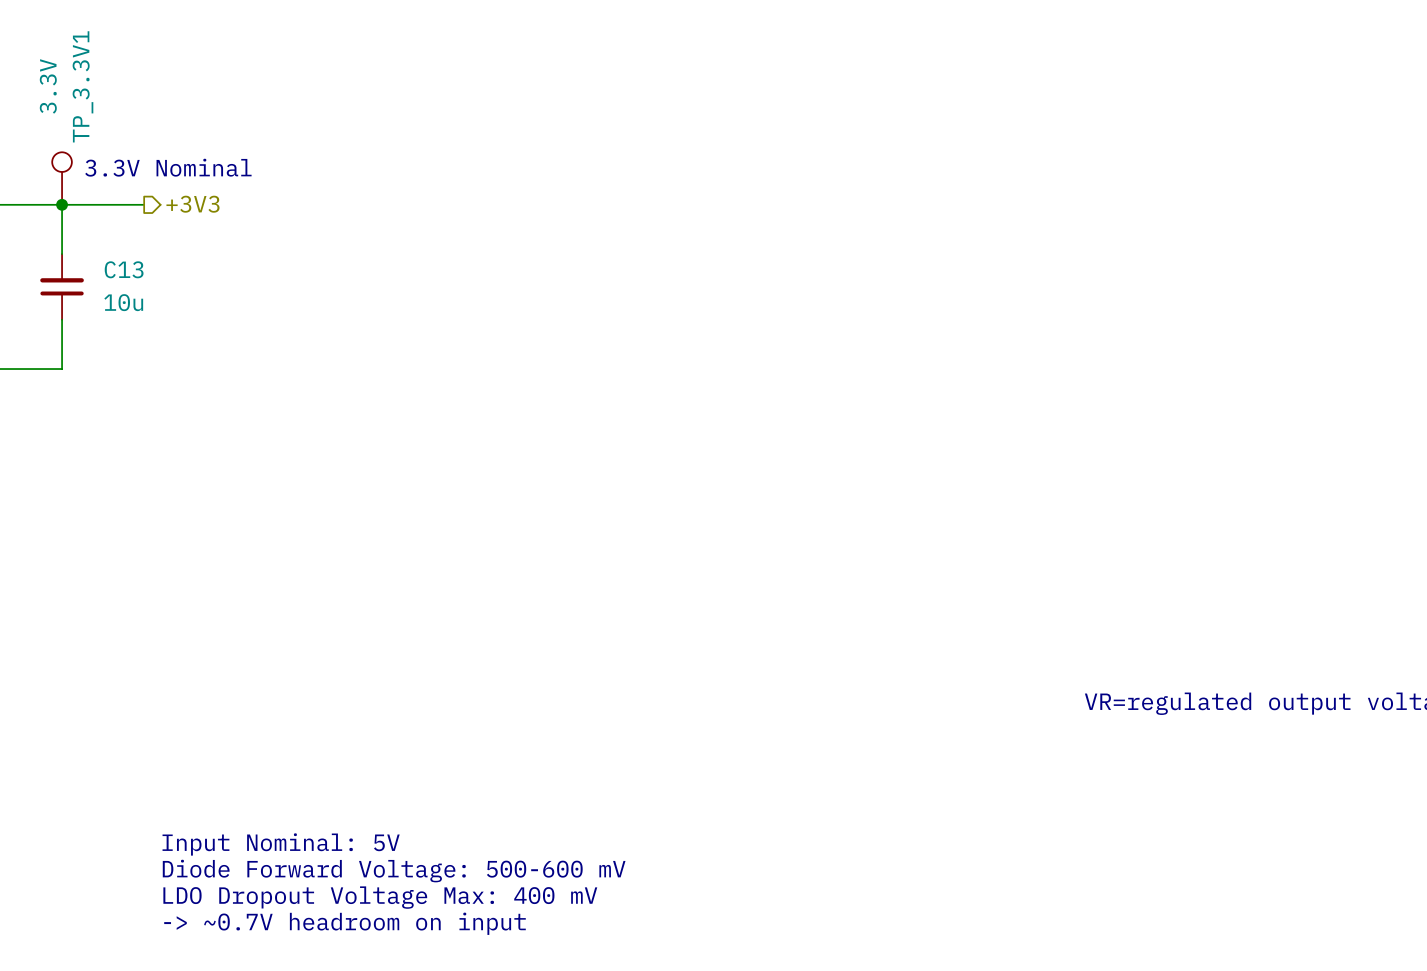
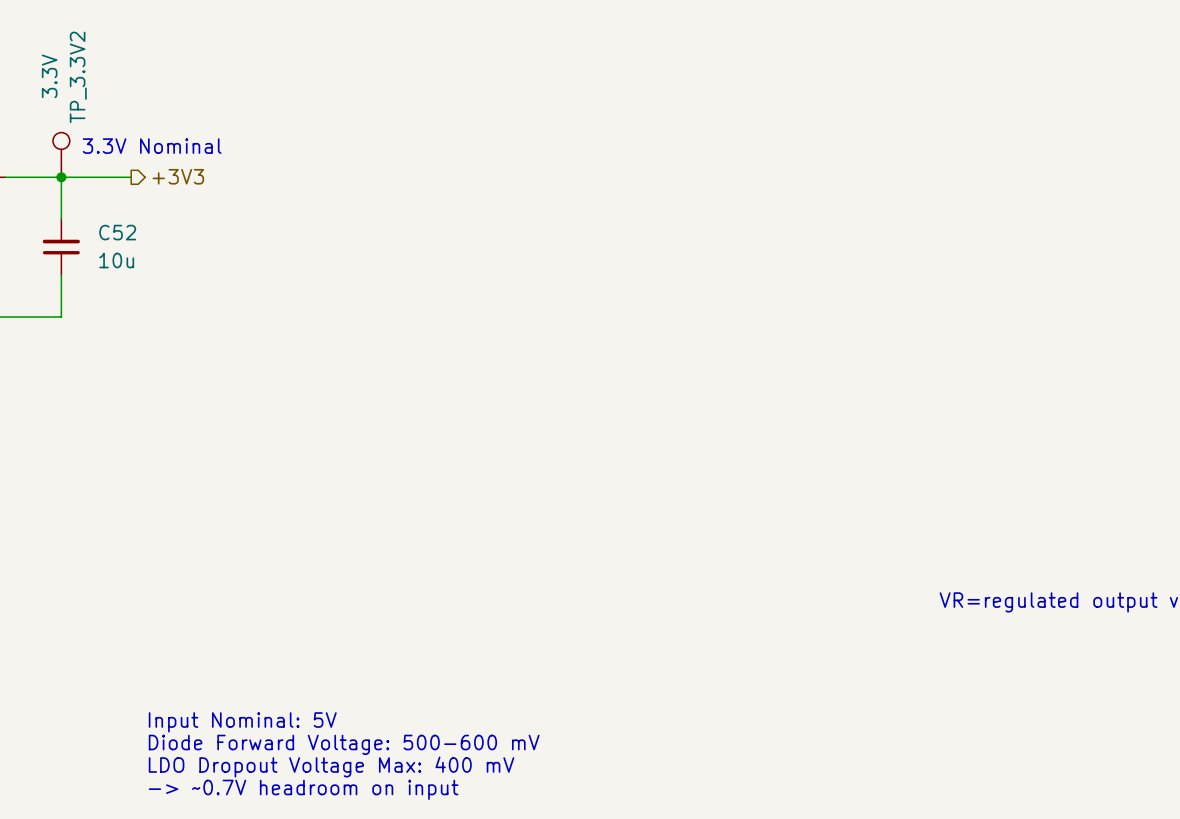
TP_3.3V1 name: TP_3.3V1 (82, 86) -> TP_3.3V2 (78, 77)
C13 name: C13 (124, 269) -> C52 (117, 232)

